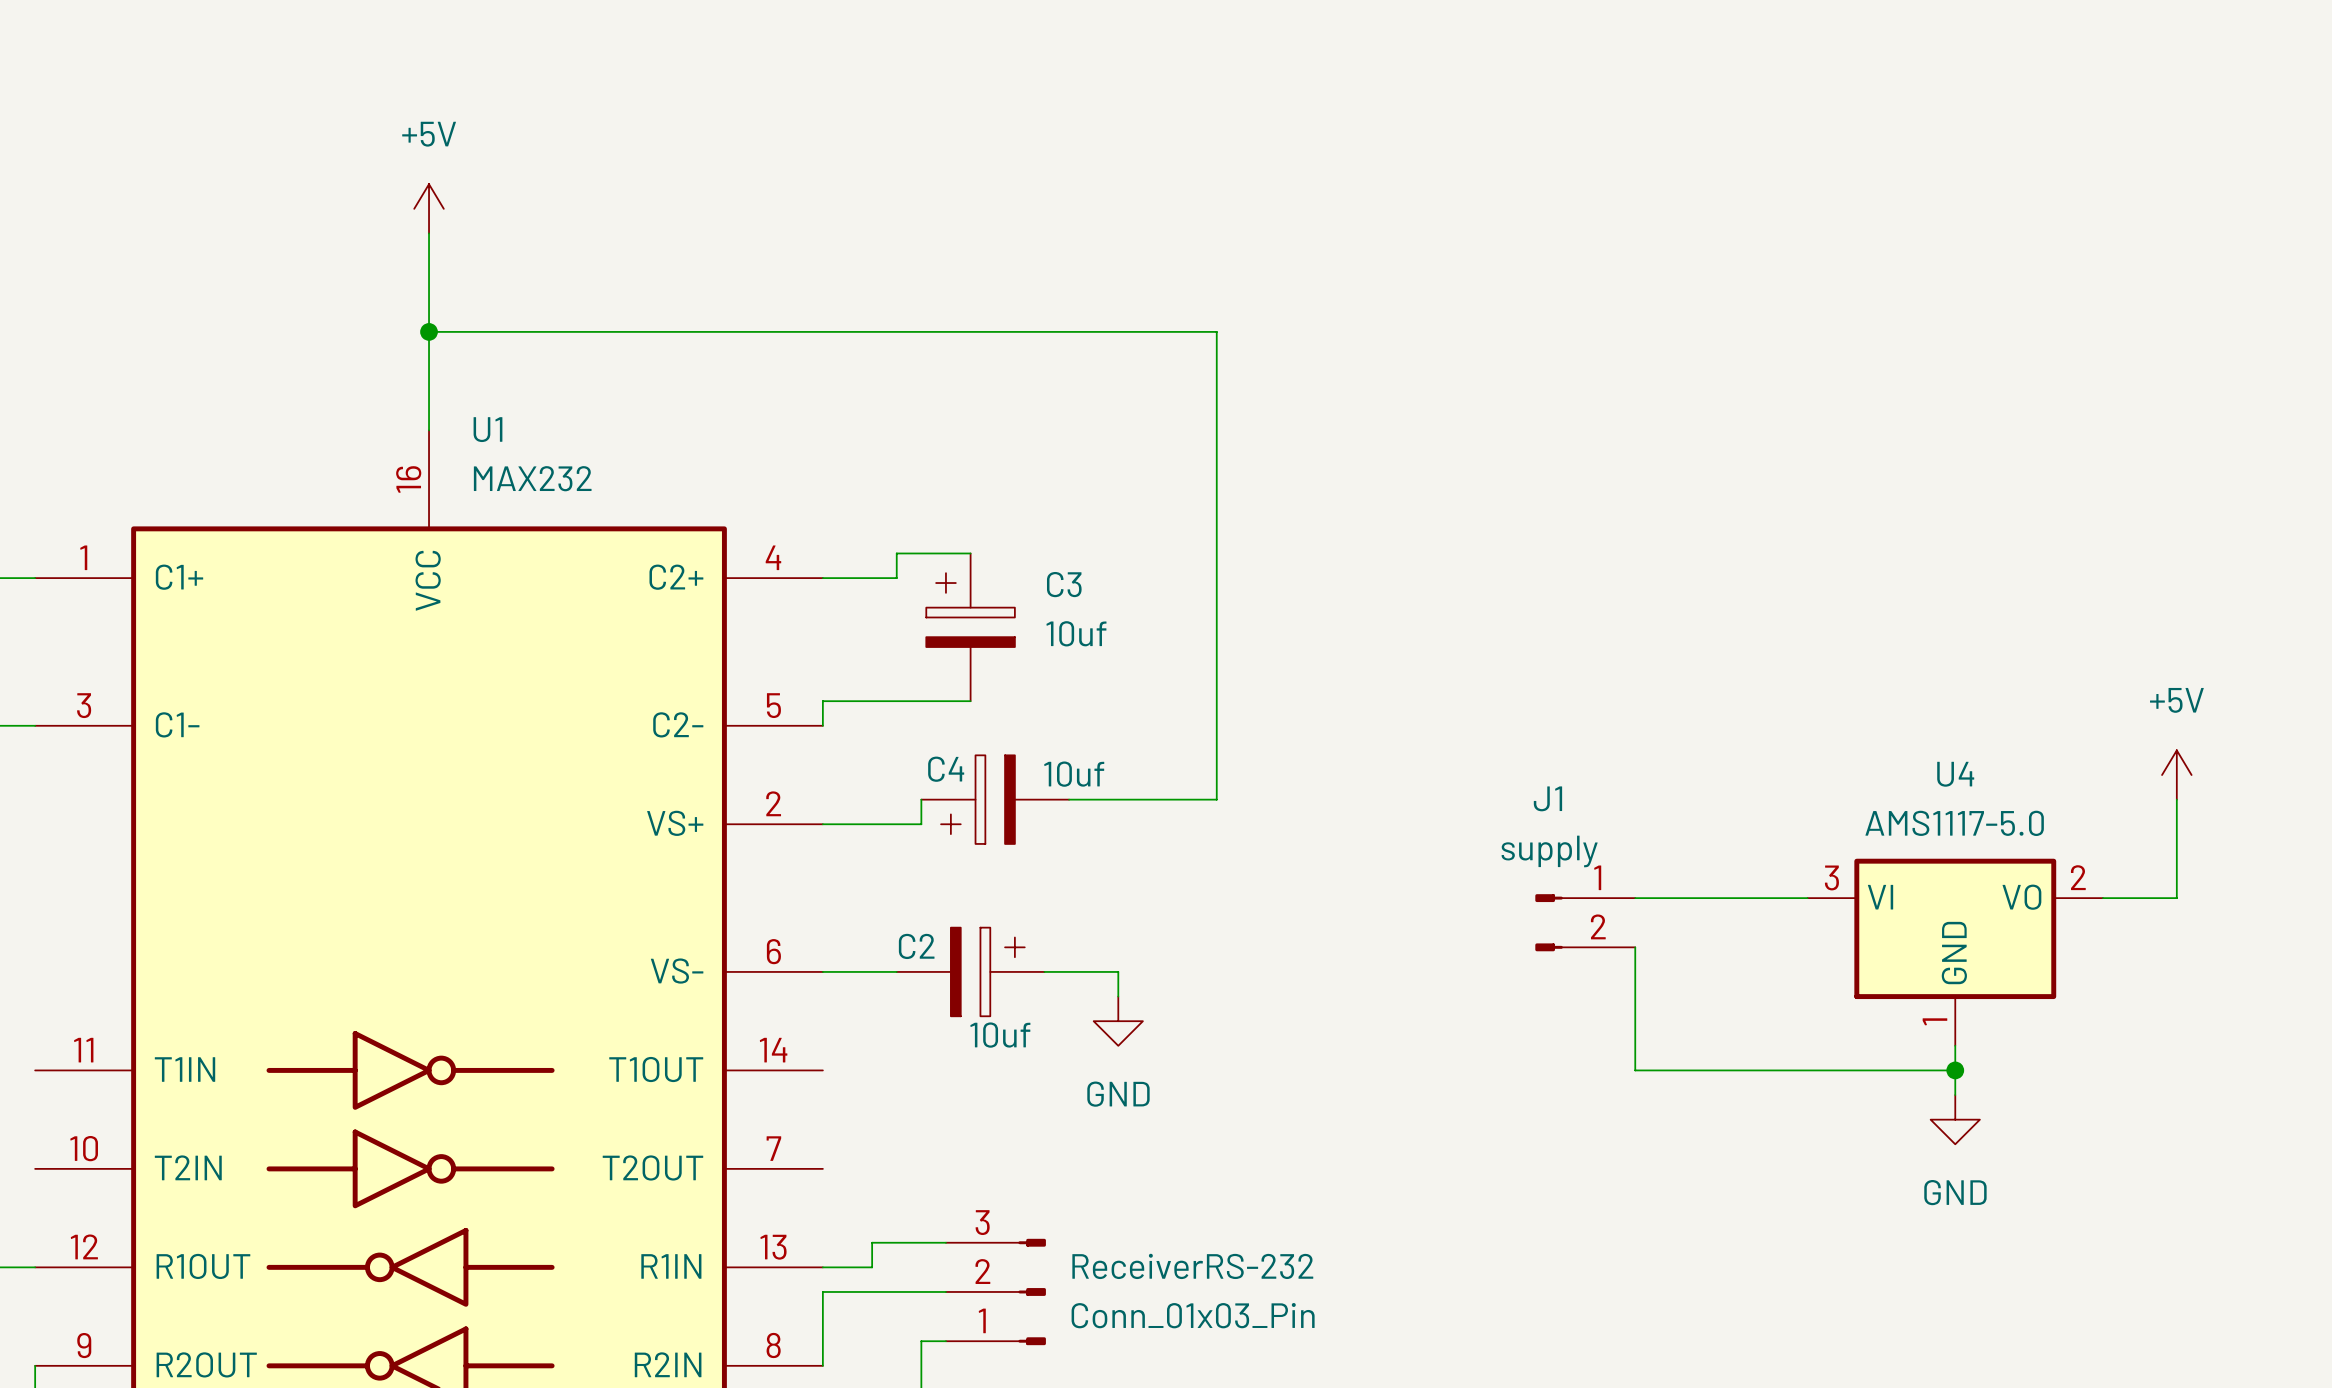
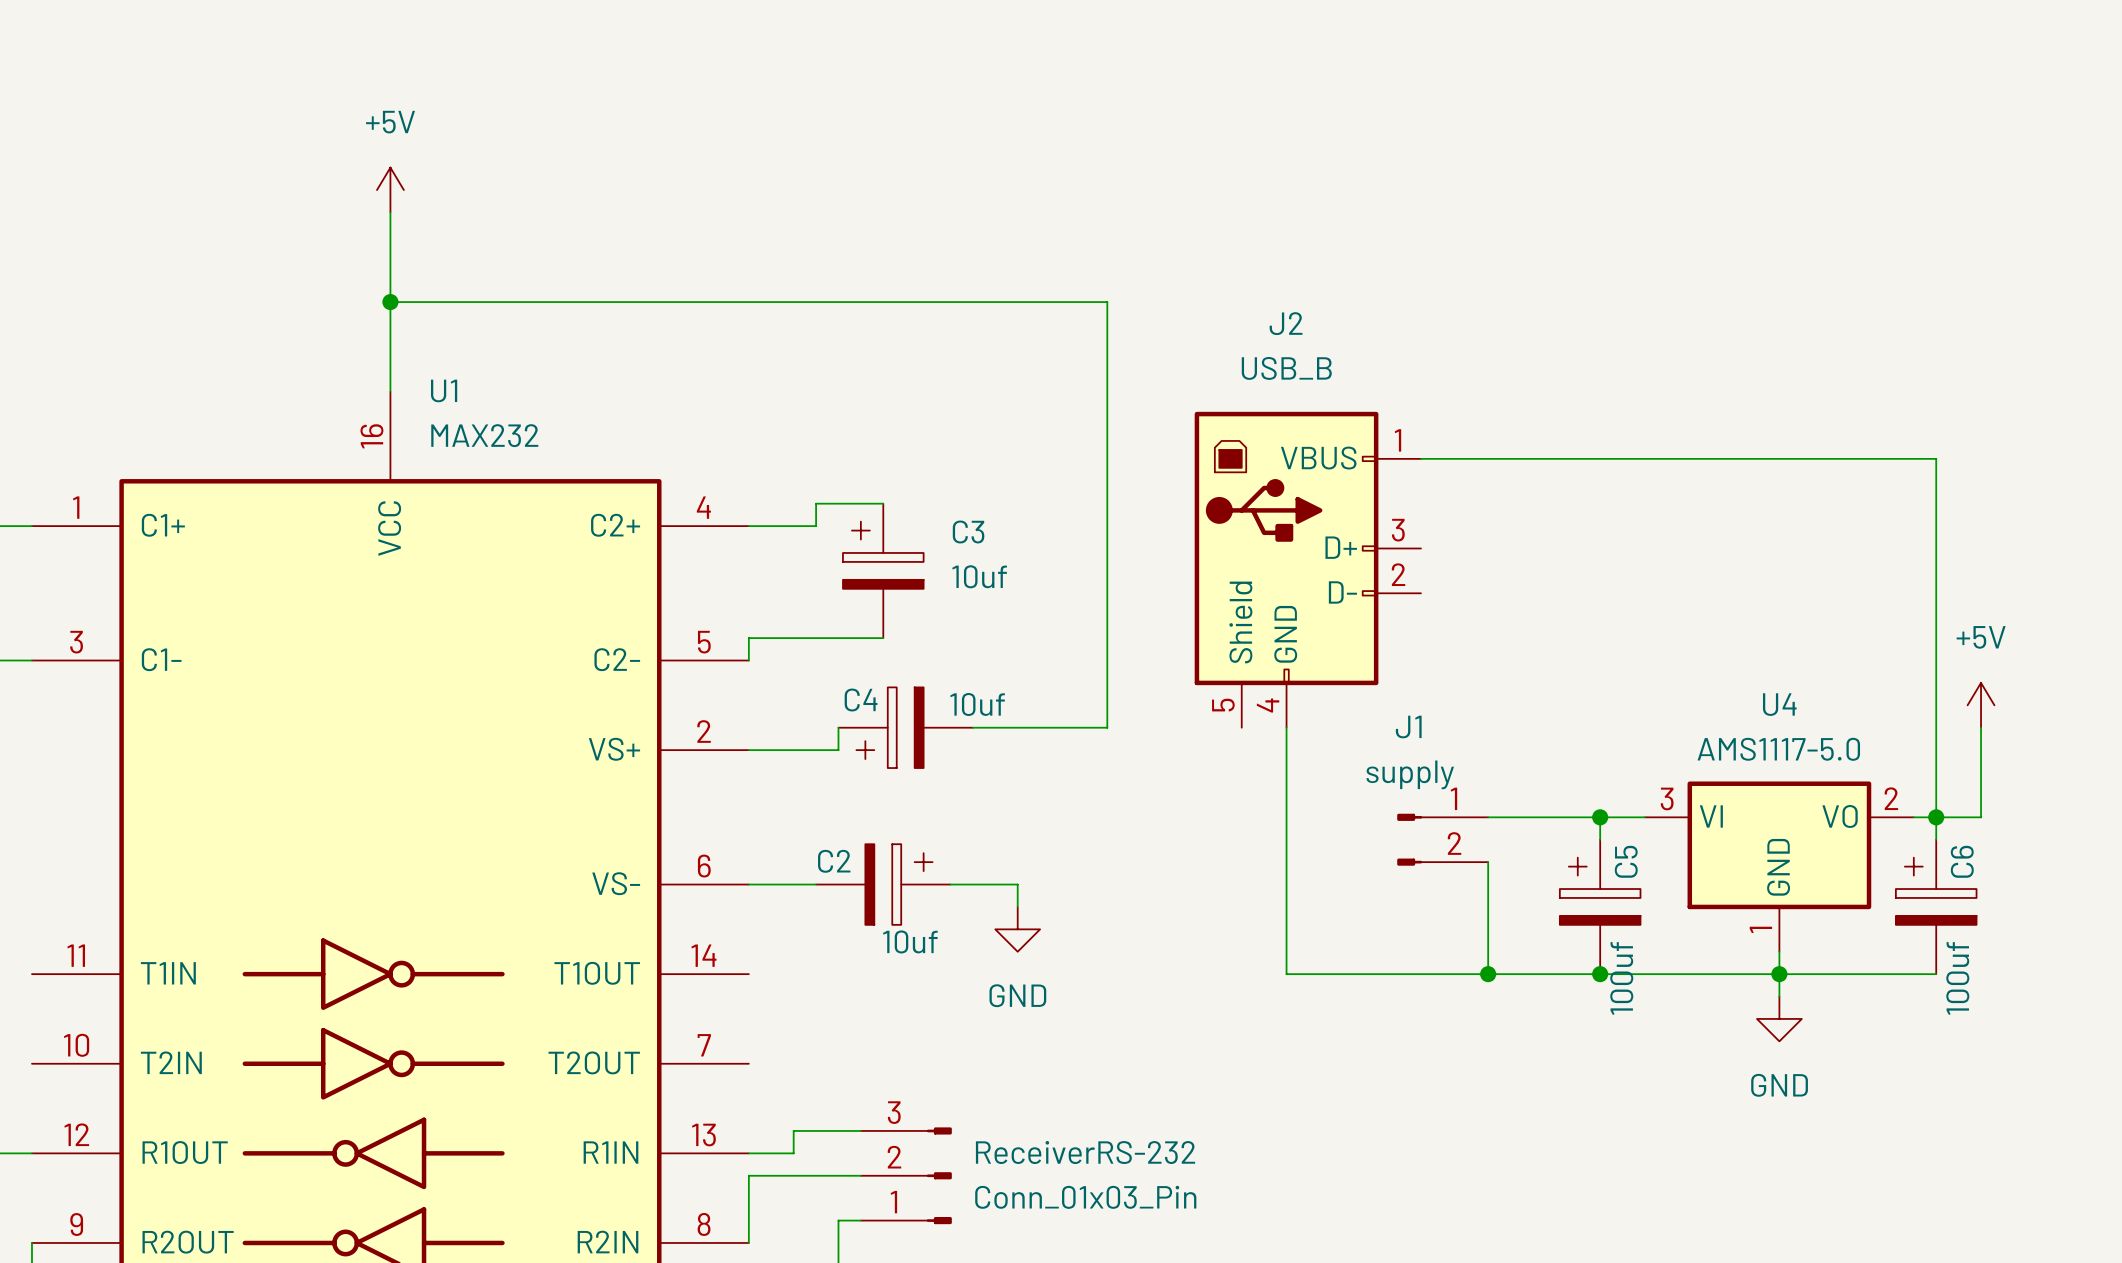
wire: none -> (1420, 458) (1936, 458) (1936, 839)
J2: none -> USB_B (1307, 569)
wire: none -> (1286, 727) (1286, 974) (1488, 974)
wire: none -> (1600, 817) (1600, 839)
junction: none -> (1600, 817)
junction: none -> (1936, 817)
C5: none -> 100uf (1600, 906)
C6: none -> 100uf (1936, 906)
junction: none -> (1488, 974)
junction: none -> (1600, 974)
wire: none -> (1779, 974) (1936, 974)

